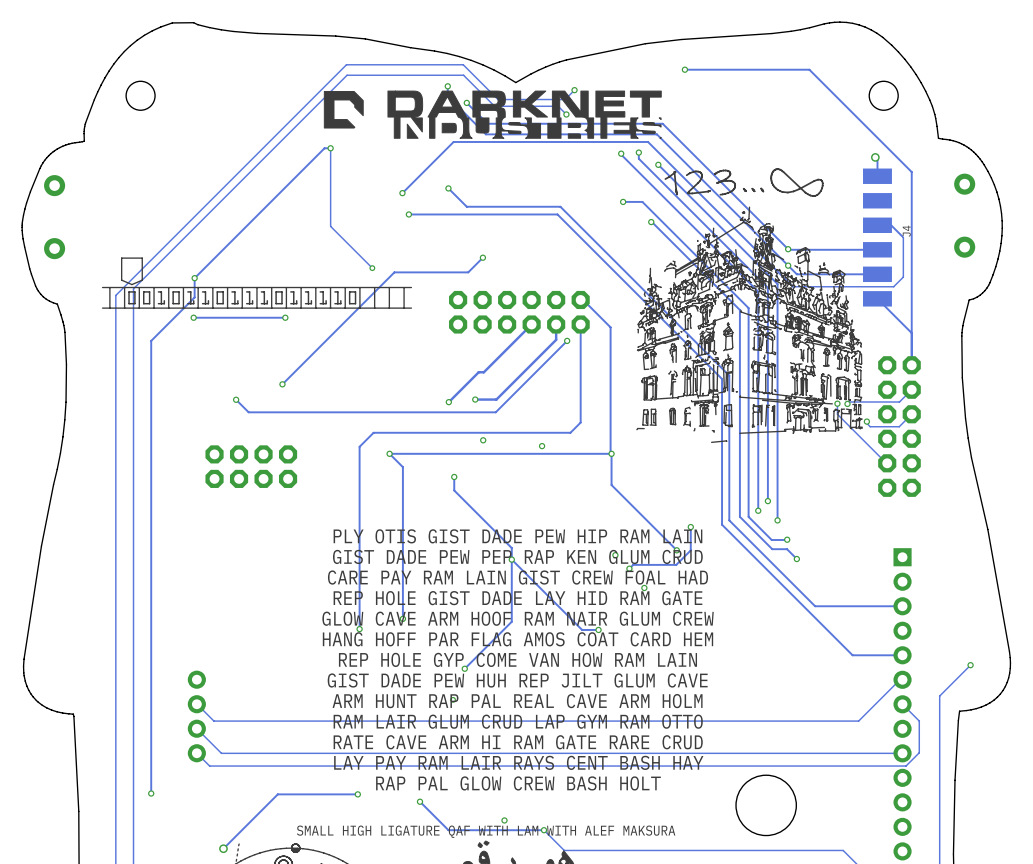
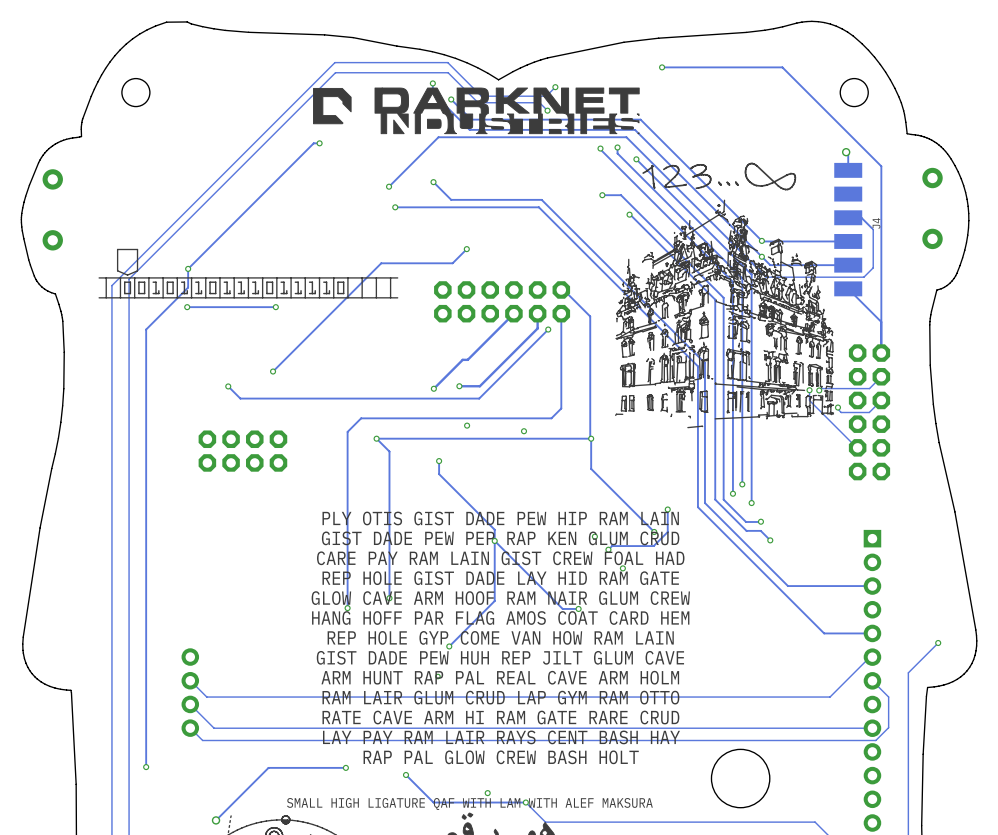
track: (330, 148) (330, 226) (372, 268) -> none
via: (372, 268) -> none

